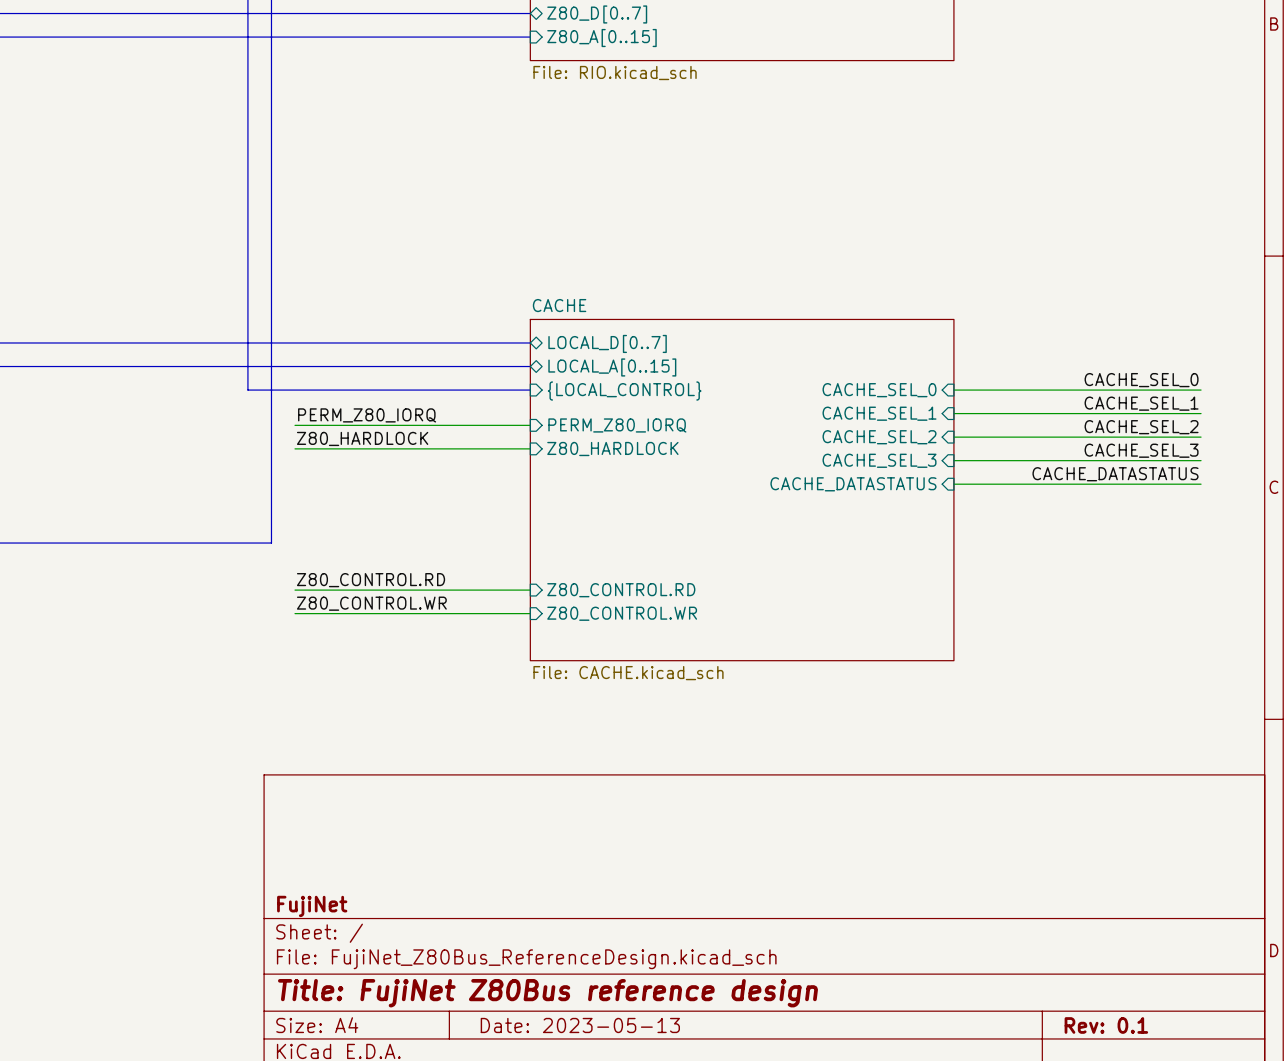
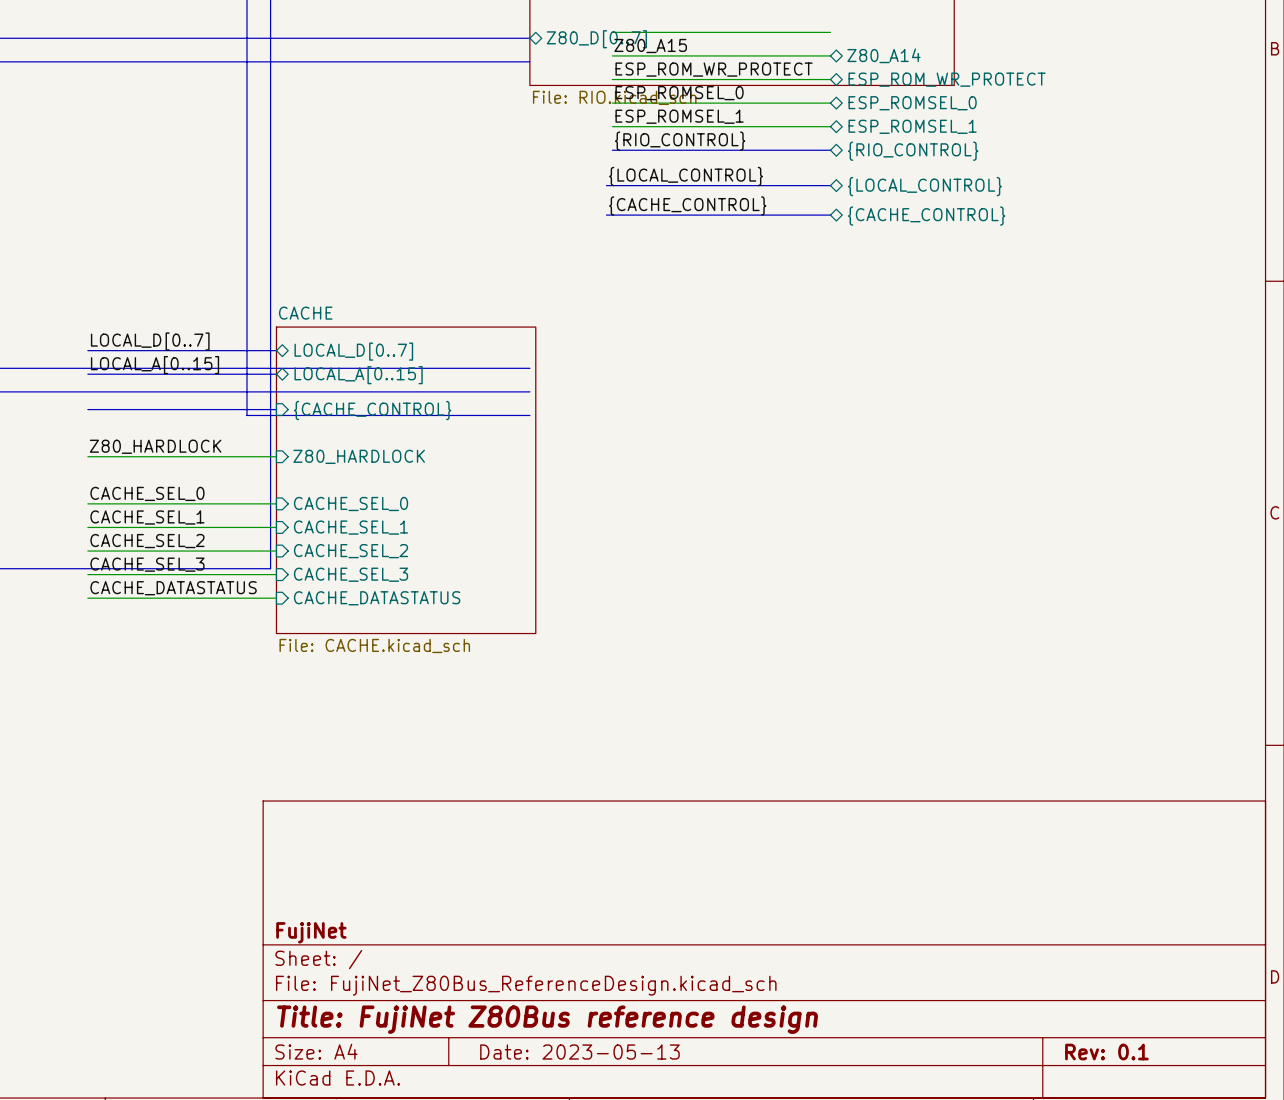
wire: none -> (612, 32) (830, 32)
label: none -> Z80_A15 (650, 46)
wire: none -> (612, 55) (830, 55)
sheet pin: none -> Z80_A14 (883, 55)
sheet pin: Z80_A[0..15] (601, 38) -> none
label: none -> ESP_ROM_WR_PROTECT (714, 69)
wire: none -> (612, 79) (830, 79)
sheet pin: none -> ESP_ROM_WR_PROTECT (947, 79)
label: none -> ESP_ROMSEL_0 (679, 93)
wire: none -> (612, 103) (830, 103)
sheet pin: none -> ESP_ROMSEL_0 (912, 103)
label: none -> ESP_ROMSEL_1 (679, 116)
wire: none -> (612, 126) (830, 126)
sheet pin: none -> ESP_ROMSEL_1 (912, 126)
label: none -> {RIO_CONTROL} (680, 141)
bus: none -> (612, 150) (830, 150)
sheet pin: none -> {RIO_CONTROL} (913, 151)
label: none -> {LOCAL_CONTROL} (686, 176)
bus: none -> (606, 185) (830, 185)
sheet pin: none -> {LOCAL_CONTROL} (924, 186)
label: none -> {CACHE_CONTROL} (687, 205)
bus: none -> (606, 215) (830, 215)
sheet pin: none -> {CACHE_CONTROL} (926, 216)
label: none -> LOCAL_D[0..7] (150, 341)
bus: none -> (87, 350) (276, 350)
sheet pin: none -> LOCAL_D[0..7] (353, 351)
label: none -> LOCAL_A[0..15] (155, 365)
sheet pin: LOCAL_D[0..7] (607, 343) -> none
bus: none -> (87, 374) (276, 374)
sheet pin: none -> LOCAL_A[0..15] (358, 375)
sheet pin: LOCAL_A[0..15] (612, 367) -> none
label: CACHE_SEL_0 (1141, 380) -> none
bus: none -> (87, 409) (276, 409)
sheet pin: none -> {CACHE_CONTROL} (372, 410)
sheet pin: CACHE_SEL_0 (879, 390) -> none
wire: (953, 390) (1201, 390) -> none
sheet pin: {LOCAL_CONTROL} (624, 391) -> none
label: CACHE_SEL_1 (1141, 403) -> none
sheet pin: CACHE_SEL_1 (879, 413) -> none
wire: (953, 413) (1201, 413) -> none
label: PERM_Z80_IORQ (367, 415) -> none
wire: (295, 425) (530, 425) -> none
sheet pin: PERM_Z80_IORQ (617, 425) -> none
label: CACHE_SEL_2 (1141, 427) -> none
wire: none -> (87, 456) (276, 456)
sheet pin: none -> Z80_HARDLOCK (359, 456)
sheet pin: CACHE_SEL_2 (879, 437) -> none
wire: (953, 437) (1201, 437) -> none
label position: Z80_HARDLOCK (362, 438) -> Z80_HARDLOCK (155, 446)
wire: (295, 448) (530, 448) -> none
sheet pin: Z80_HARDLOCK (612, 449) -> none
label: CACHE_SEL_3 (1141, 450) -> none
sheet CACHE: none -> File: CACHE.kicad_sch (406, 480)
sheet pin: CACHE_SEL_3 (879, 460) -> none
wire: (953, 460) (1201, 460) -> none
label: none -> CACHE_SEL_0 (147, 493)
label: CACHE_DATASTATUS (1115, 474) -> none
wire: none -> (87, 503) (276, 503)
sheet pin: none -> CACHE_SEL_0 (351, 504)
sheet pin: CACHE_DATASTATUS (853, 484) -> none
wire: (953, 484) (1201, 484) -> none
sheet CACHE: File: CACHE.kicad_sch (742, 490) -> none
label: none -> CACHE_SEL_1 (147, 517)
wire: none -> (87, 527) (276, 527)
sheet pin: none -> CACHE_SEL_1 (351, 527)
label: none -> CACHE_SEL_2 (147, 541)
wire: none -> (87, 551) (276, 551)
sheet pin: none -> CACHE_SEL_2 (351, 551)
label: none -> CACHE_SEL_3 (147, 564)
wire: none -> (87, 574) (276, 574)
sheet pin: none -> CACHE_SEL_3 (351, 574)
label: none -> CACHE_DATASTATUS (173, 588)
wire: none -> (87, 598) (276, 598)
sheet pin: none -> CACHE_DATASTATUS (377, 598)
label: Z80_CONTROL.RD (371, 580) -> none
wire: (295, 590) (530, 590) -> none
sheet pin: Z80_CONTROL.RD (621, 590) -> none
label: Z80_CONTROL.WR (371, 603) -> none
wire: (295, 613) (530, 613) -> none
sheet pin: Z80_CONTROL.WR (622, 613) -> none

